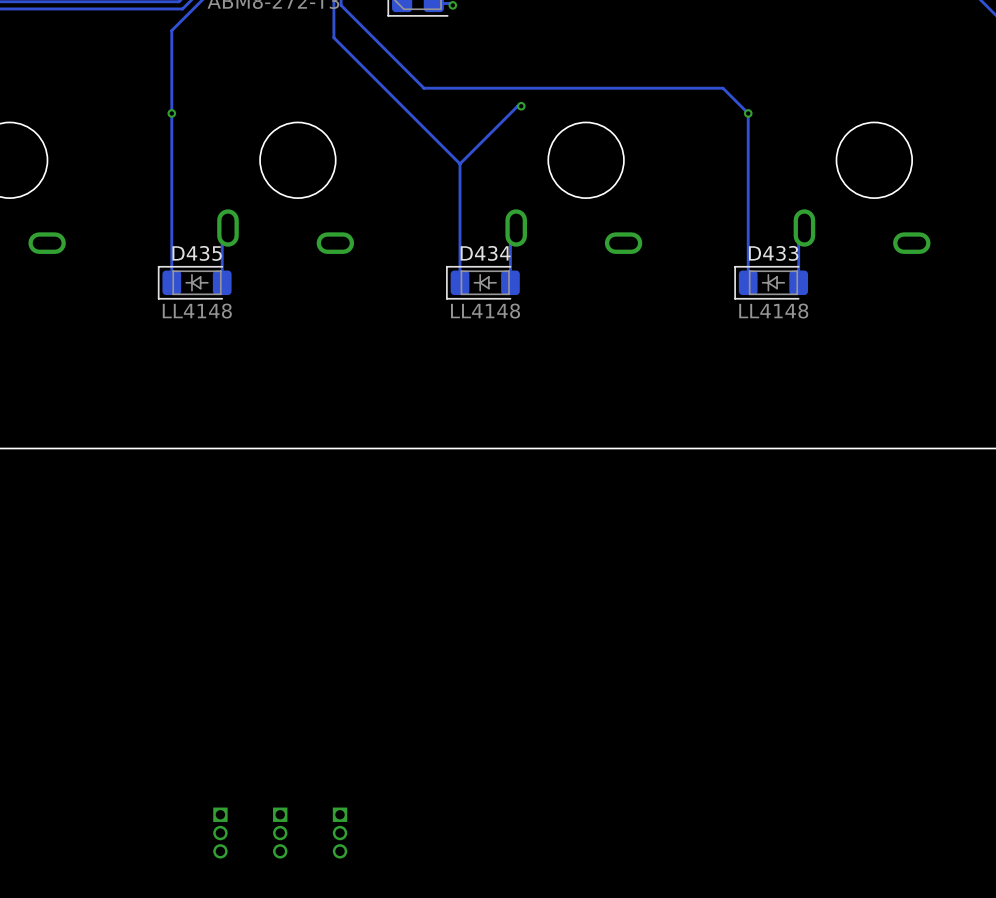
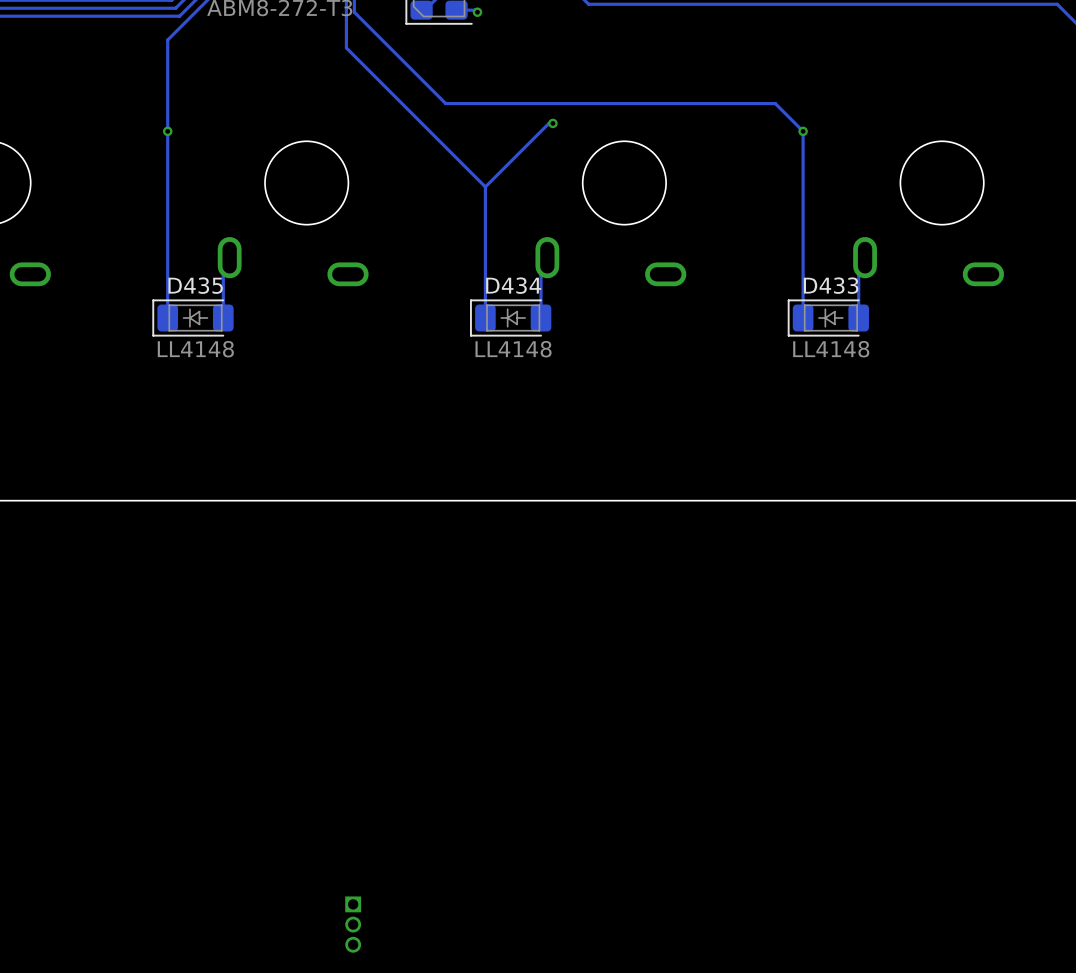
part: (220, 833) -> none
part: (280, 833) -> none

